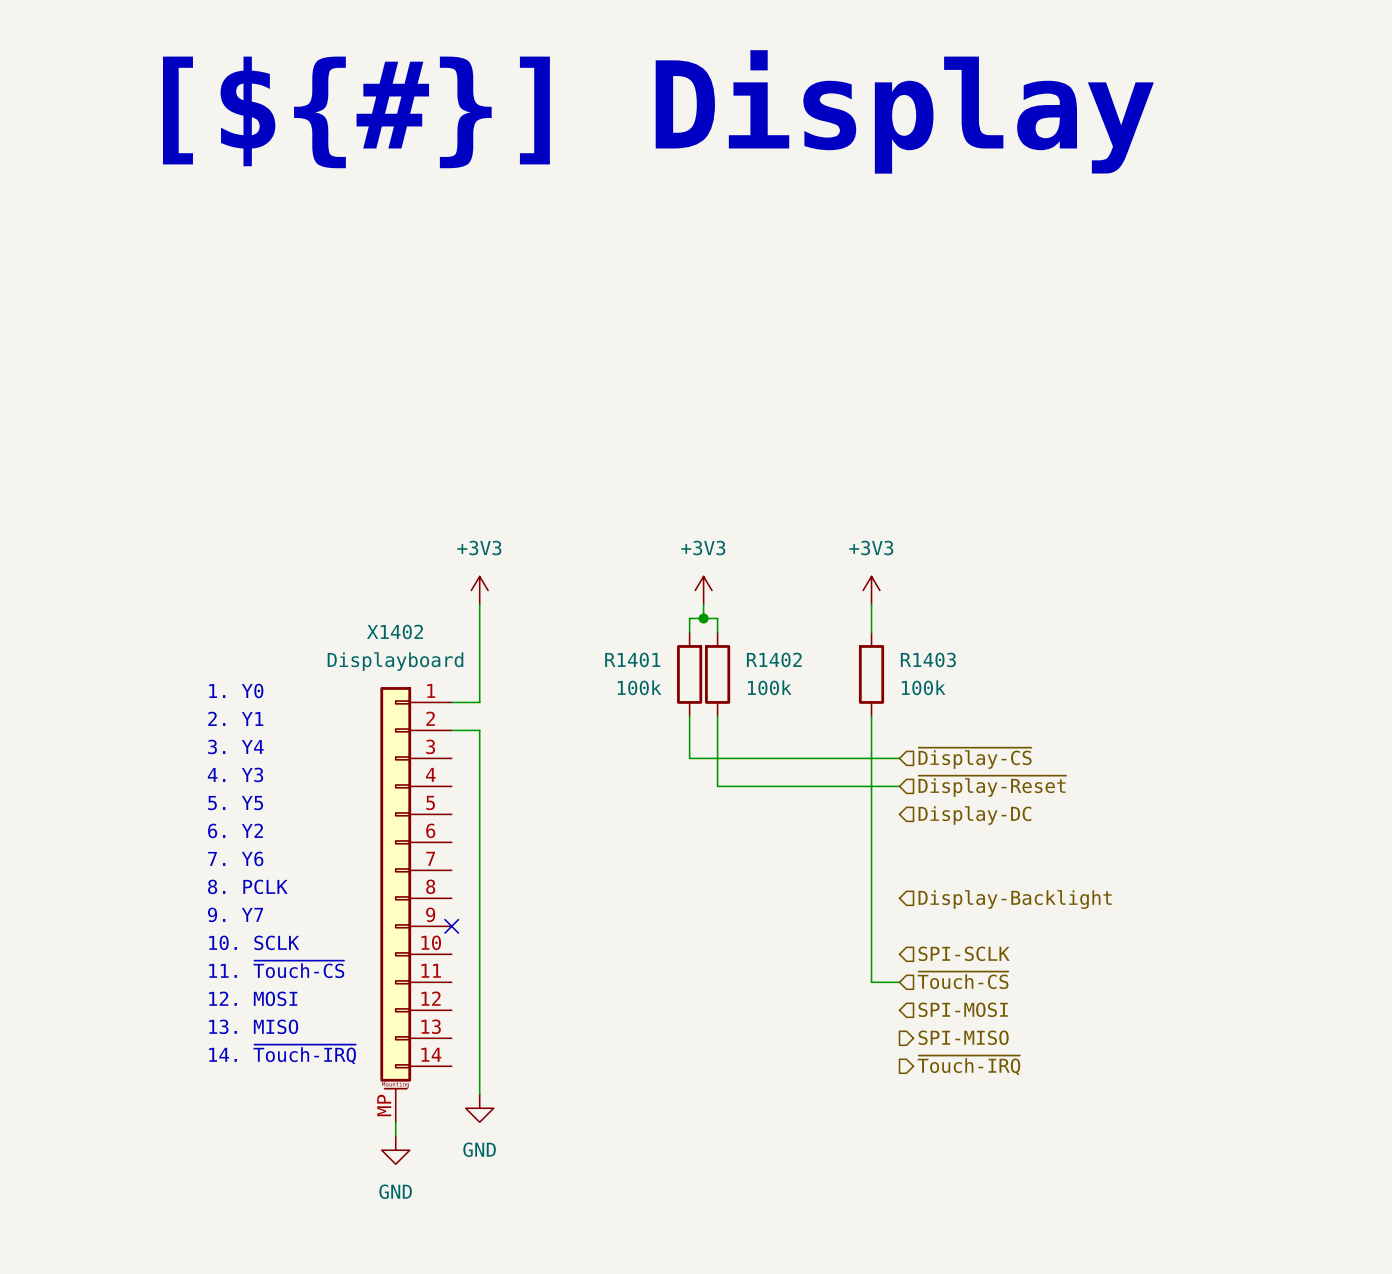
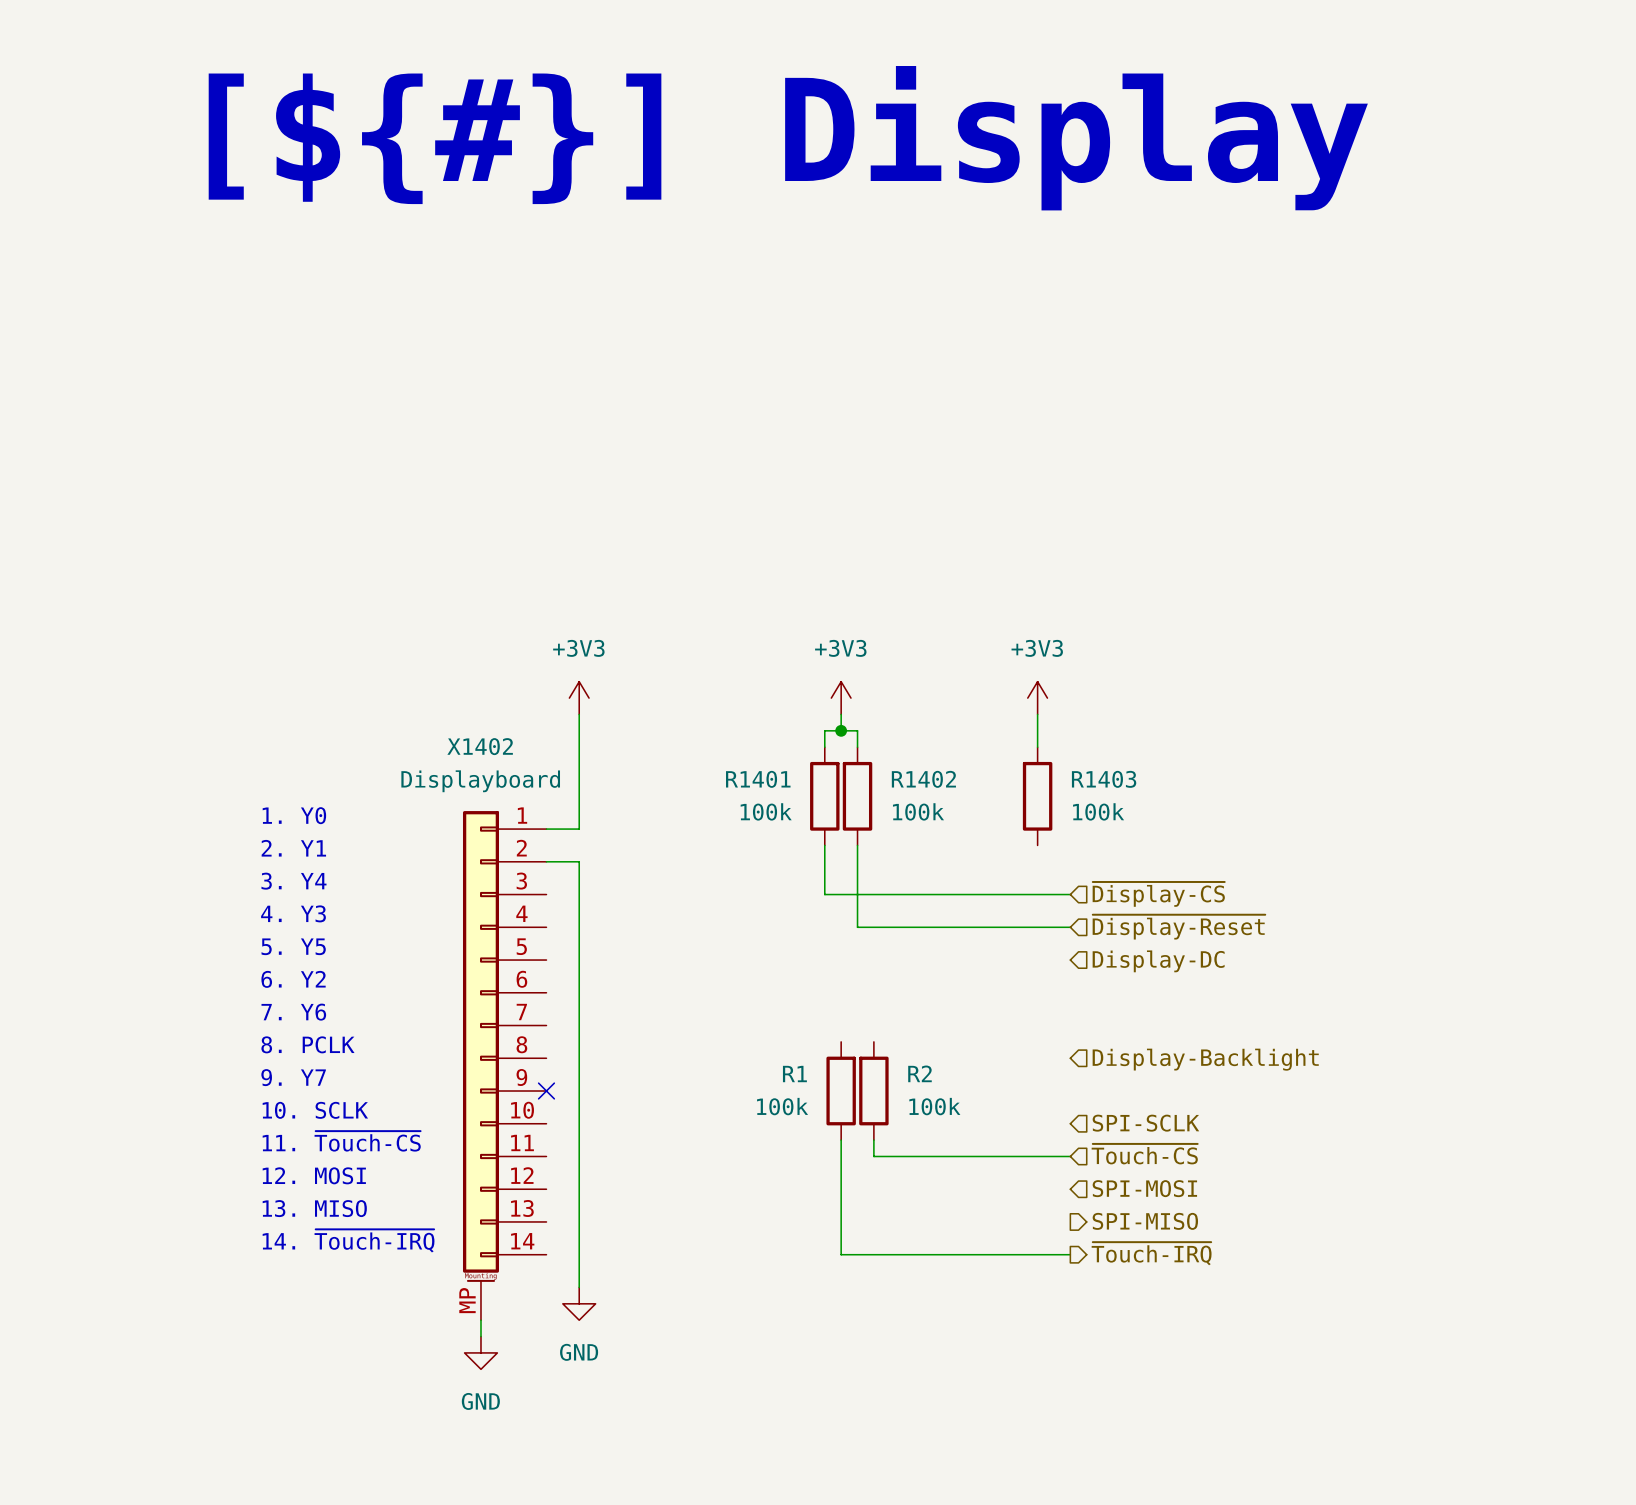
wire: (871, 716) (871, 982) -> (873, 1140) (873, 1156) (1037, 1156)
R1: none -> 100k (841, 1091)
R2: none -> 100k (873, 1091)
wire: none -> (841, 1140) (841, 1254) (1070, 1254)

